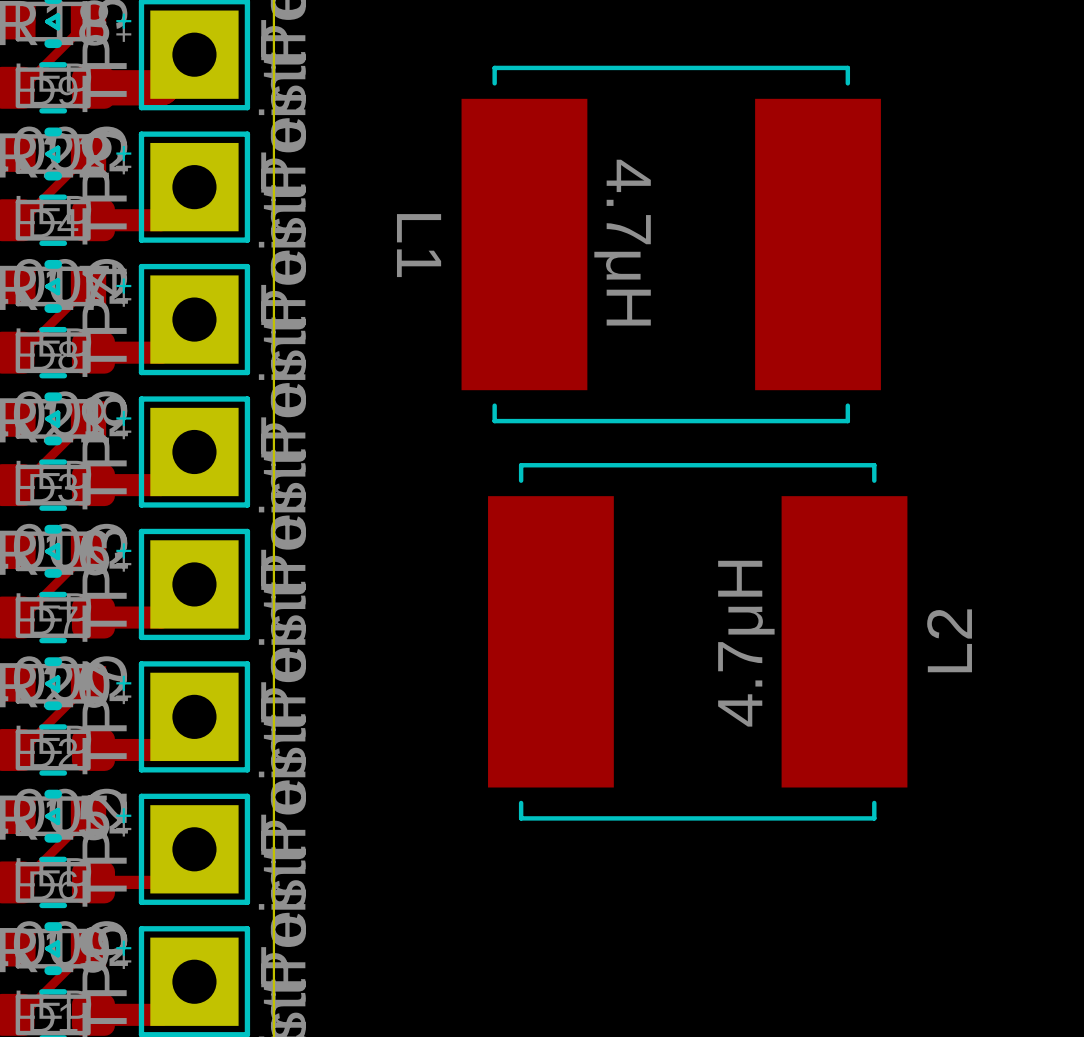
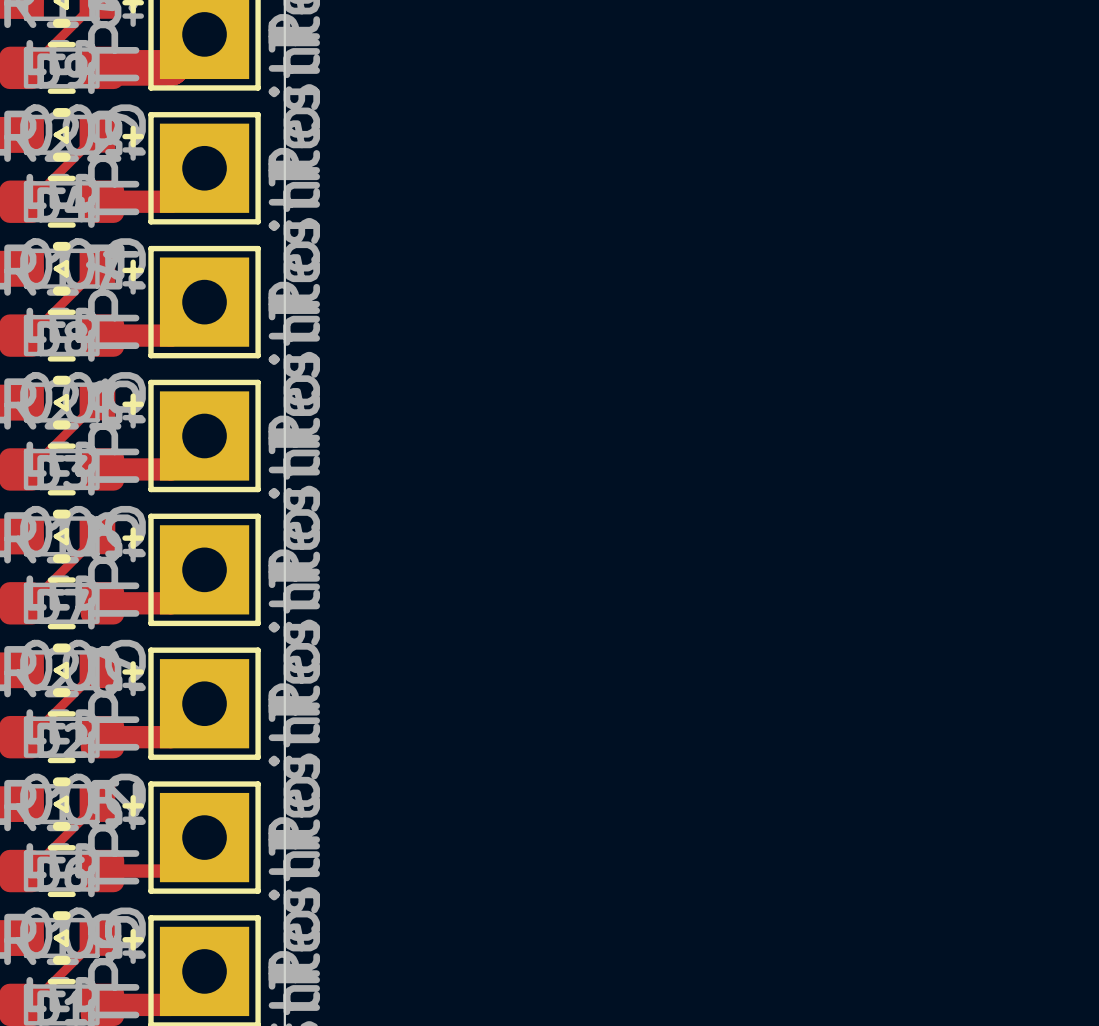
L1: 4.7μH (671, 244) -> none
L2: 4.7μH (697, 641) -> none

